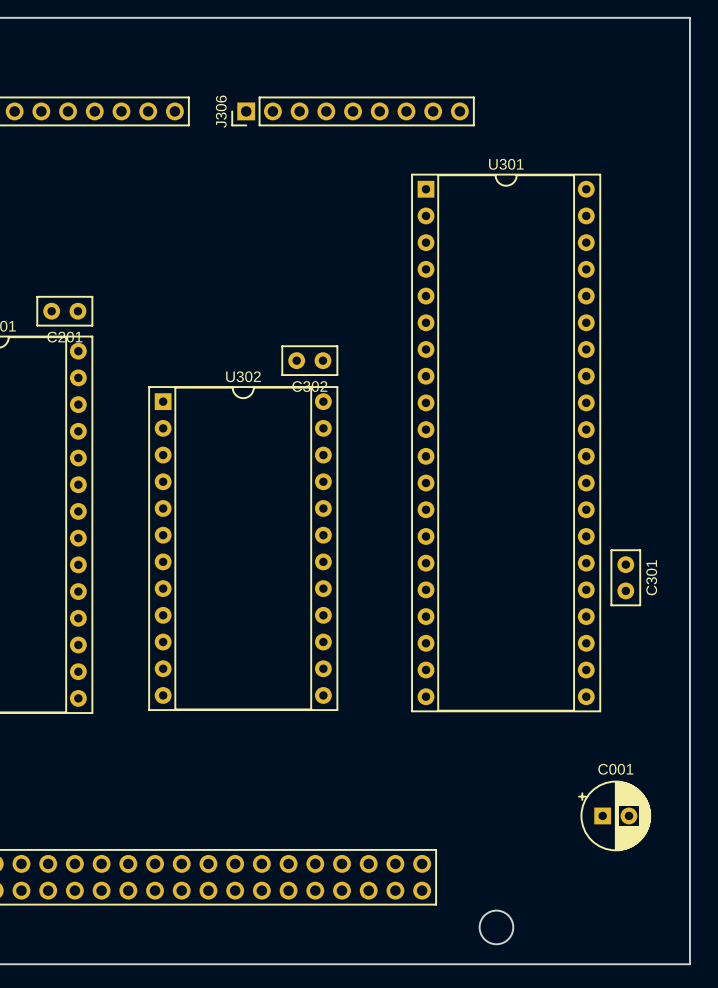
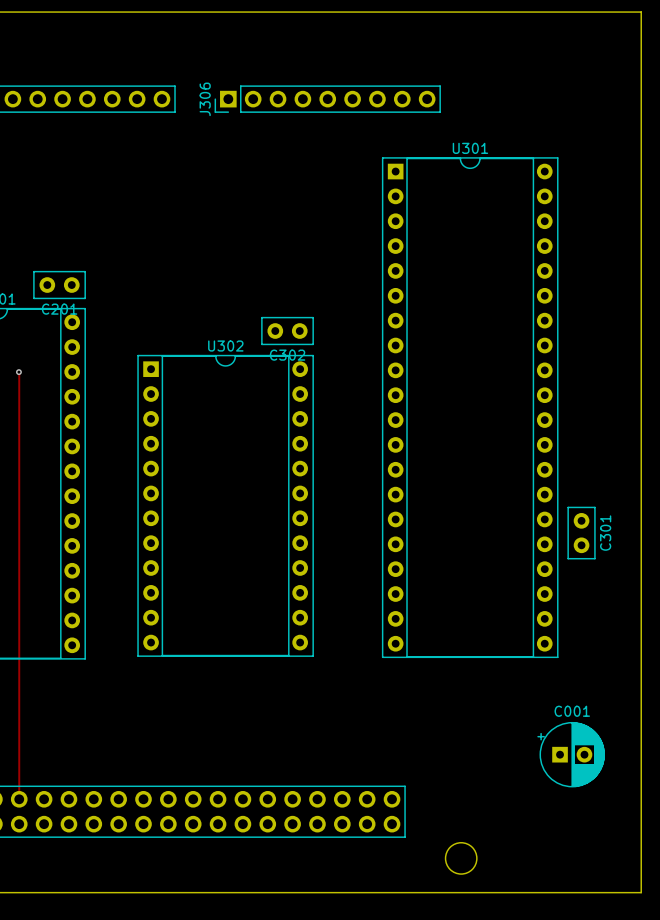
track: none -> (18, 372) (19, 799)
via: none -> (18, 372)

